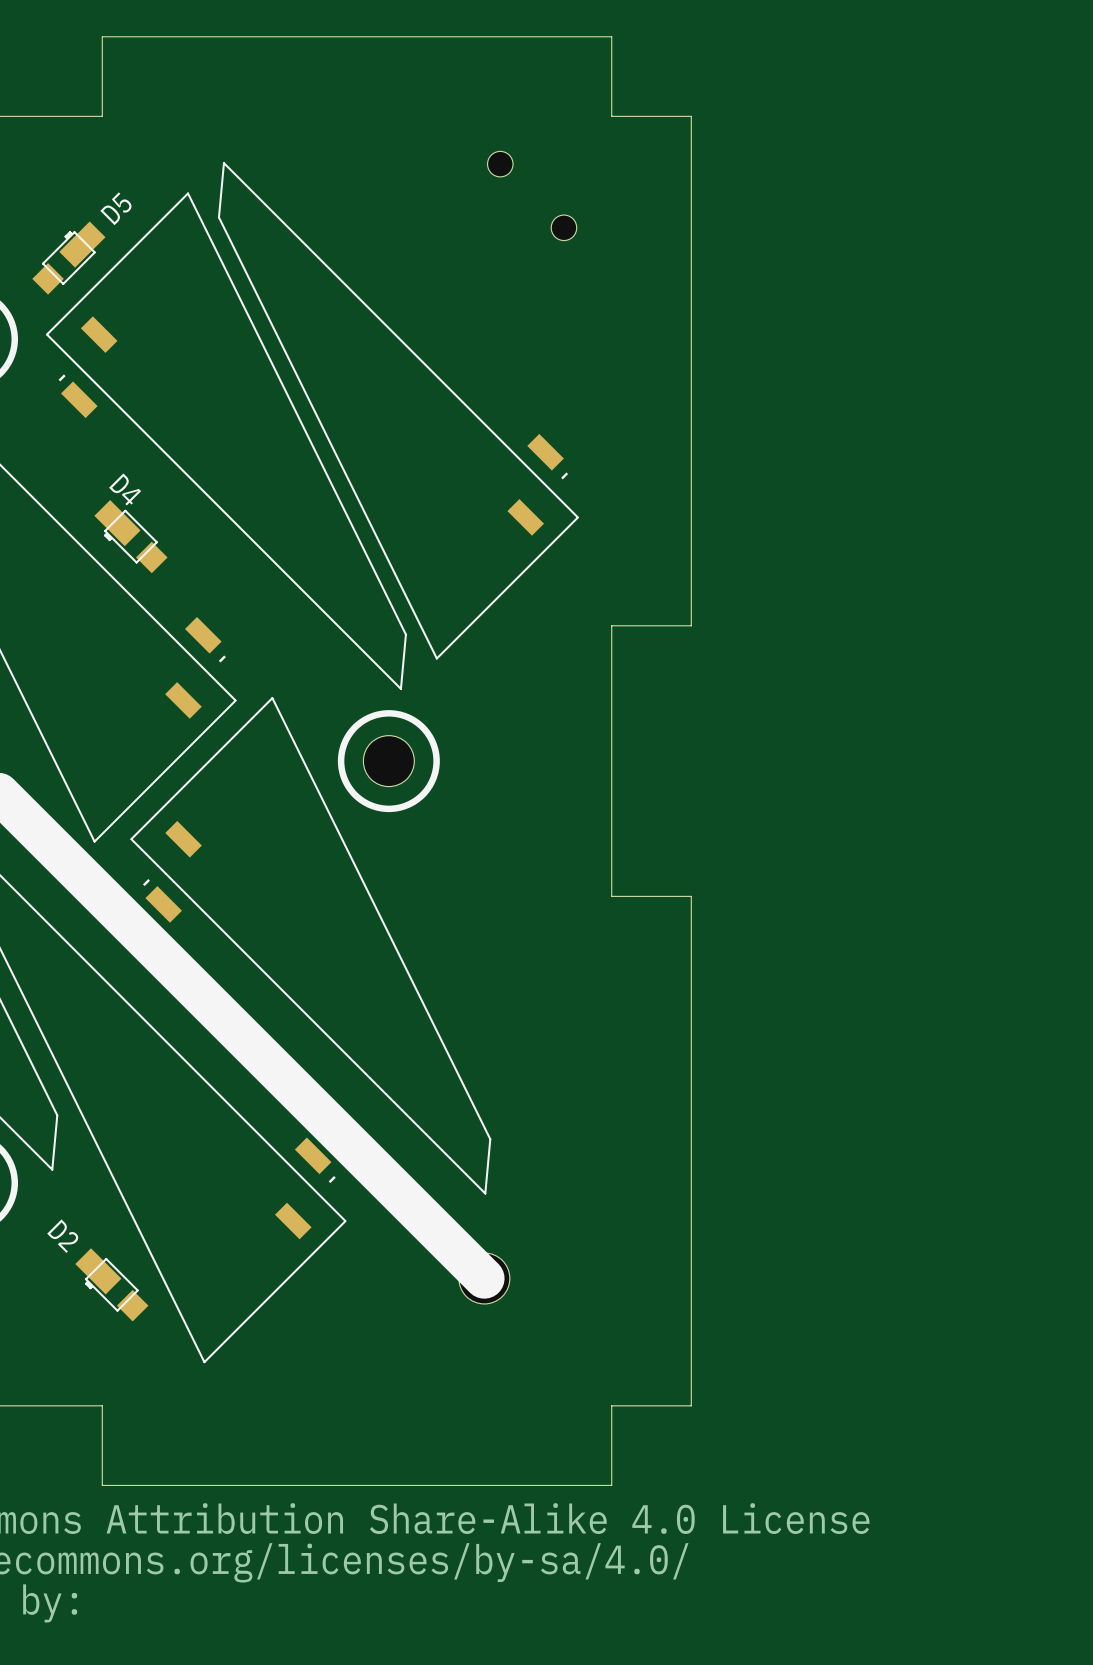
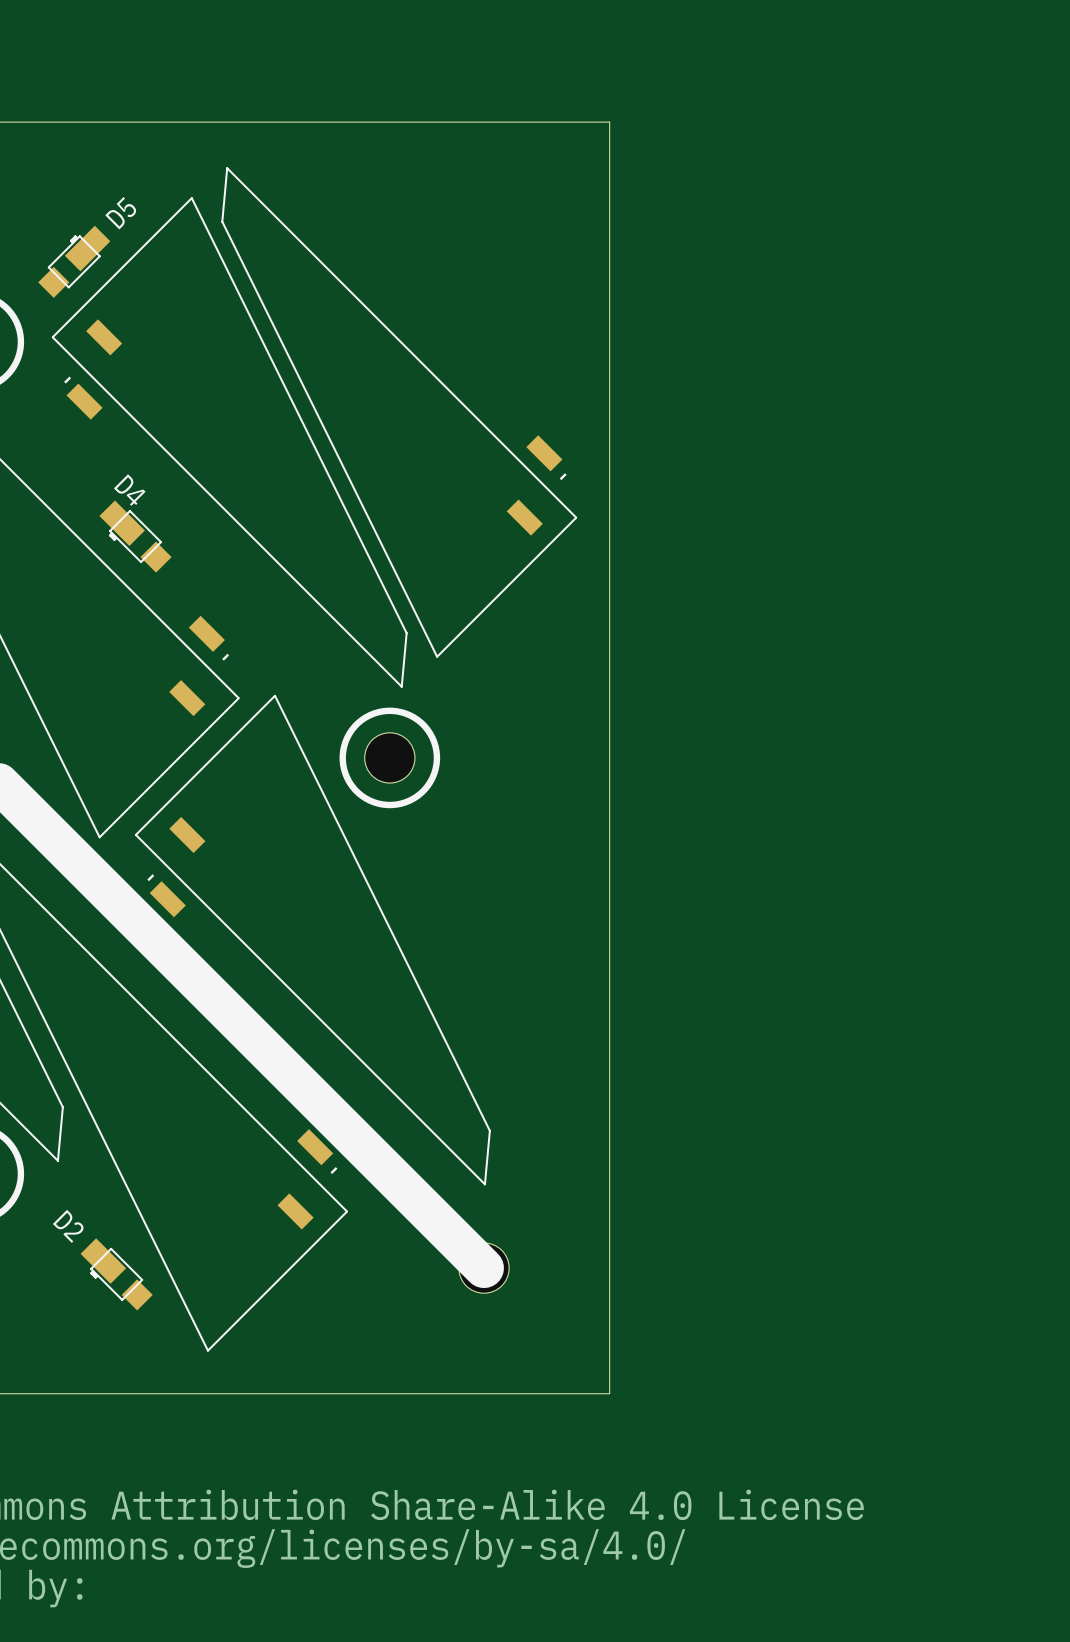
board edge: (102, 116) (102, 36) (611, 36) (611, 116) (691, 116) (691, 625) (611, 625) -> (107, 122) (609, 122) (609, 624)
hole: (500, 164) -> none
hole: (563, 227) -> none
board edge: (611, 896) (691, 896) (691, 1405) (611, 1405) (611, 1485) (102, 1485) (102, 1405) -> (609, 891) (609, 1393) (107, 1393)

